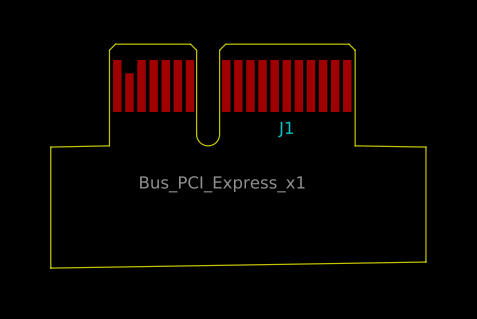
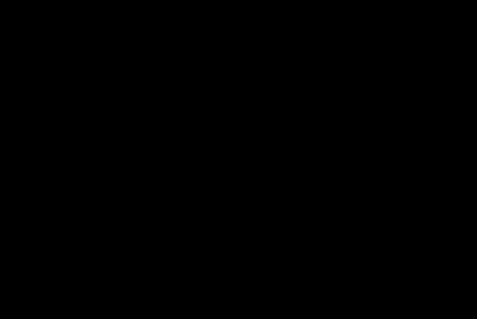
J1: Bus_PCI_Express_x1 (232, 95) -> none
board edge: (109, 145) (50, 147) (50, 268) (425, 262) (425, 147) (355, 145) -> none

